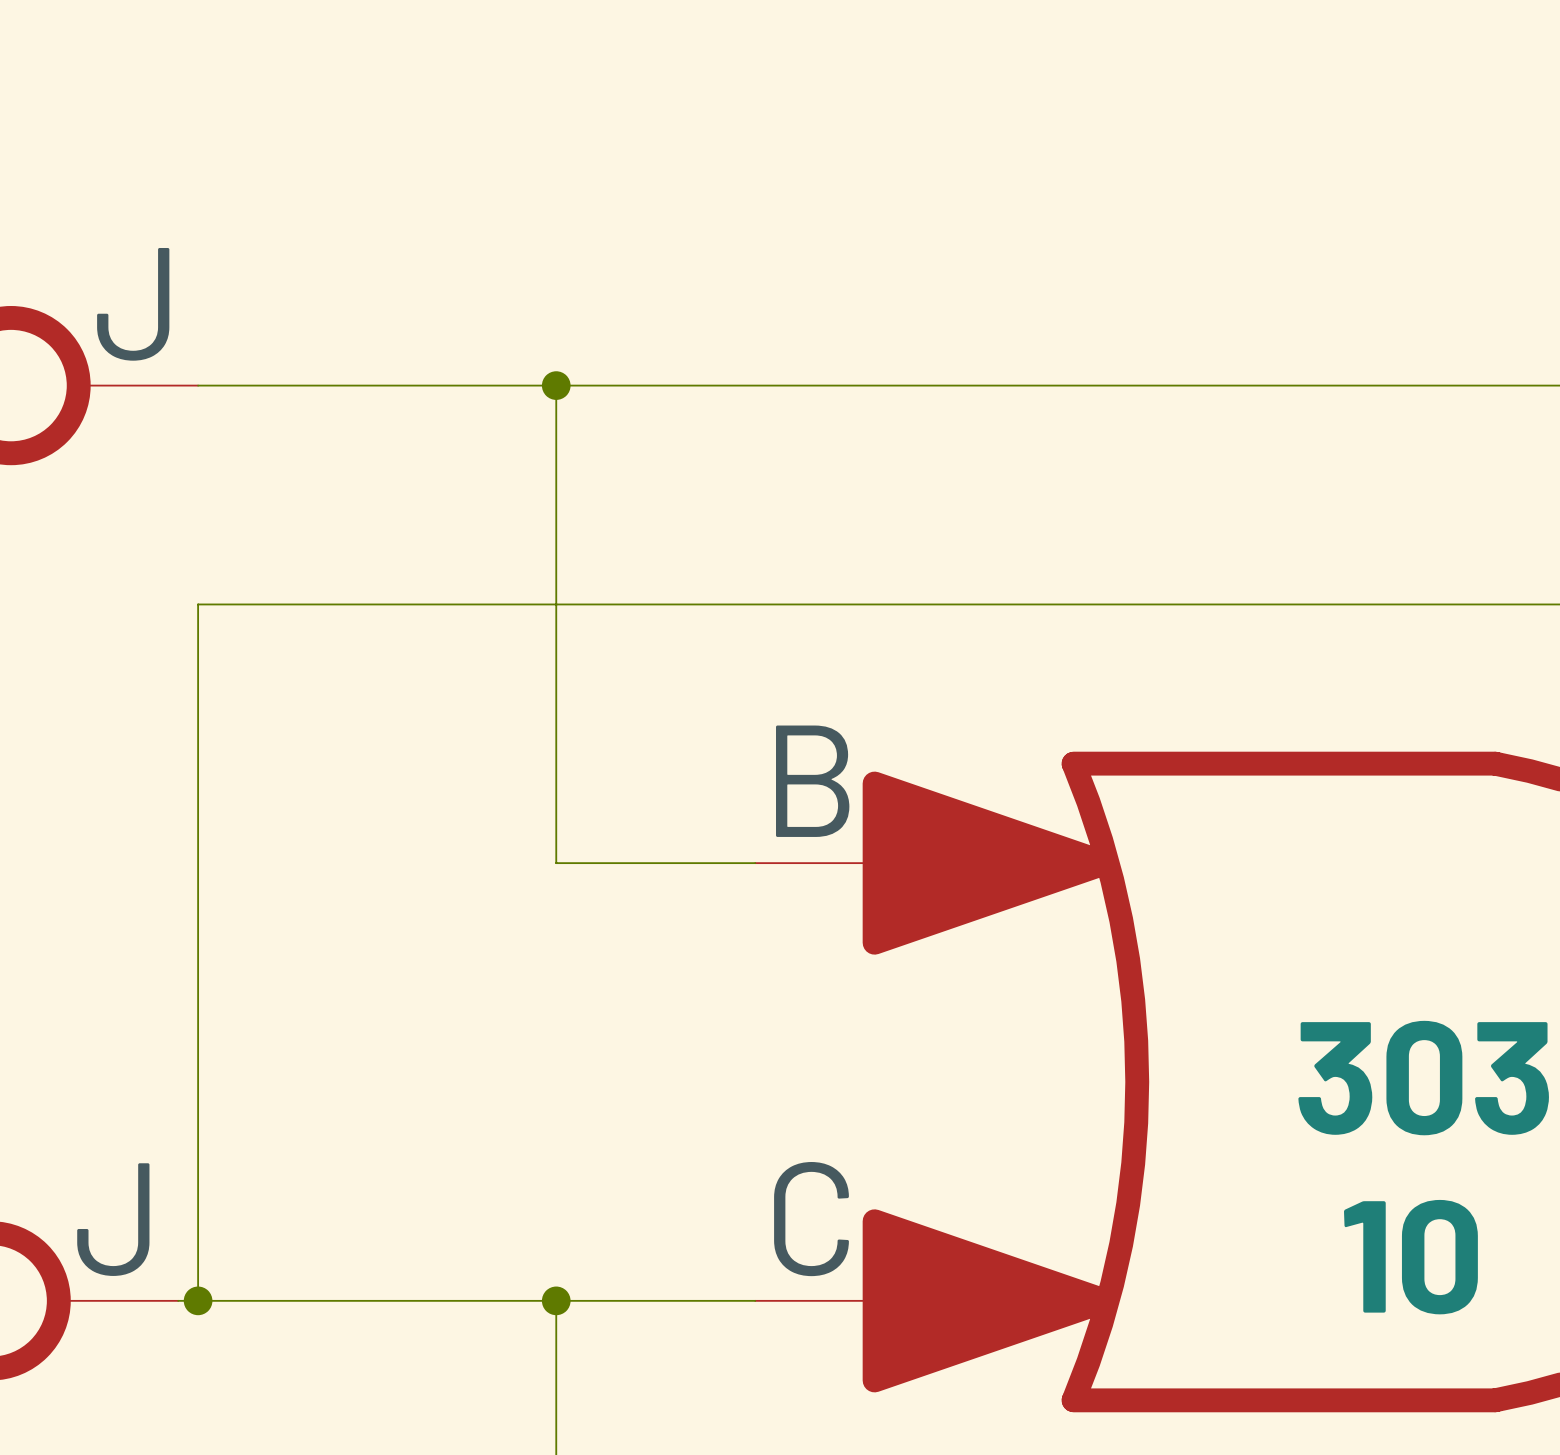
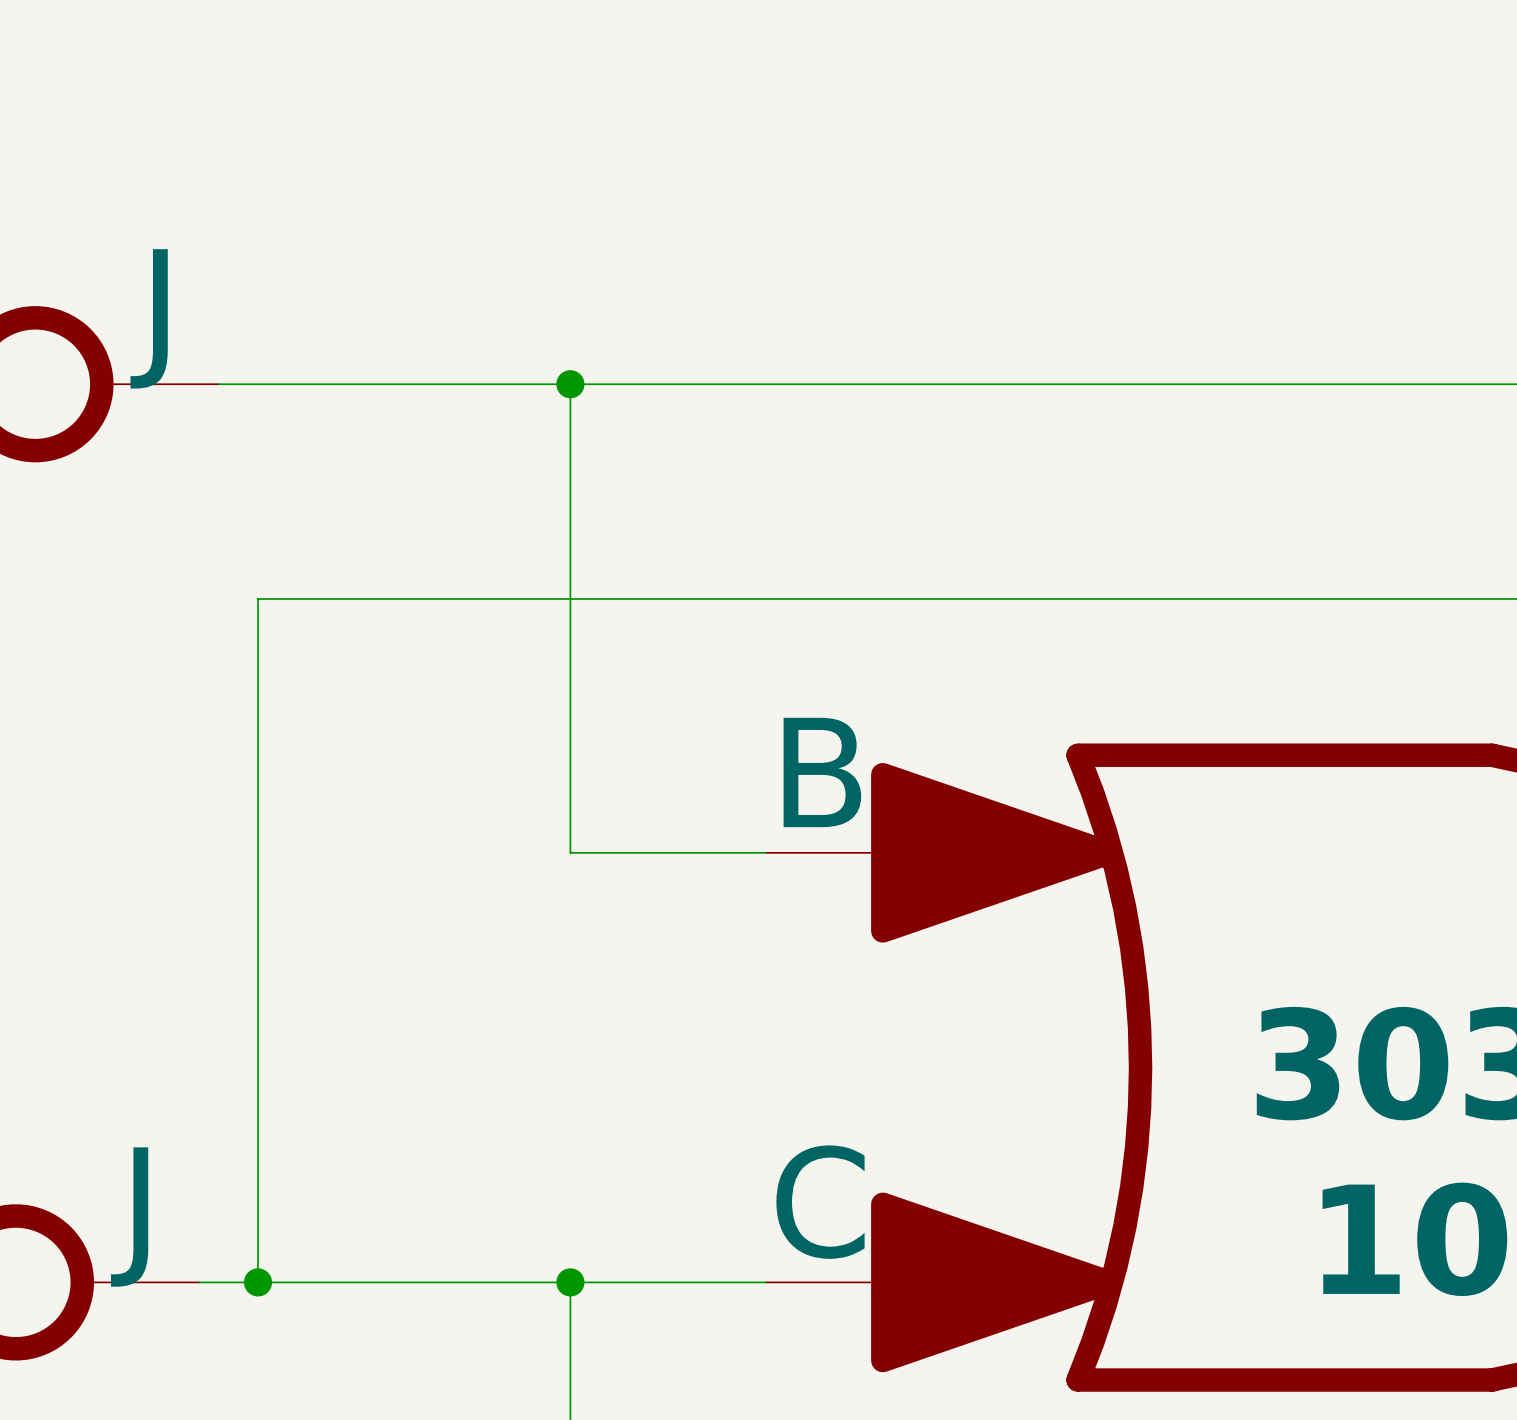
wire: (237, 604) (198, 604) (198, 1300) -> (258, 599) (258, 1282)
junction position: (198, 1300) -> (258, 1282)

